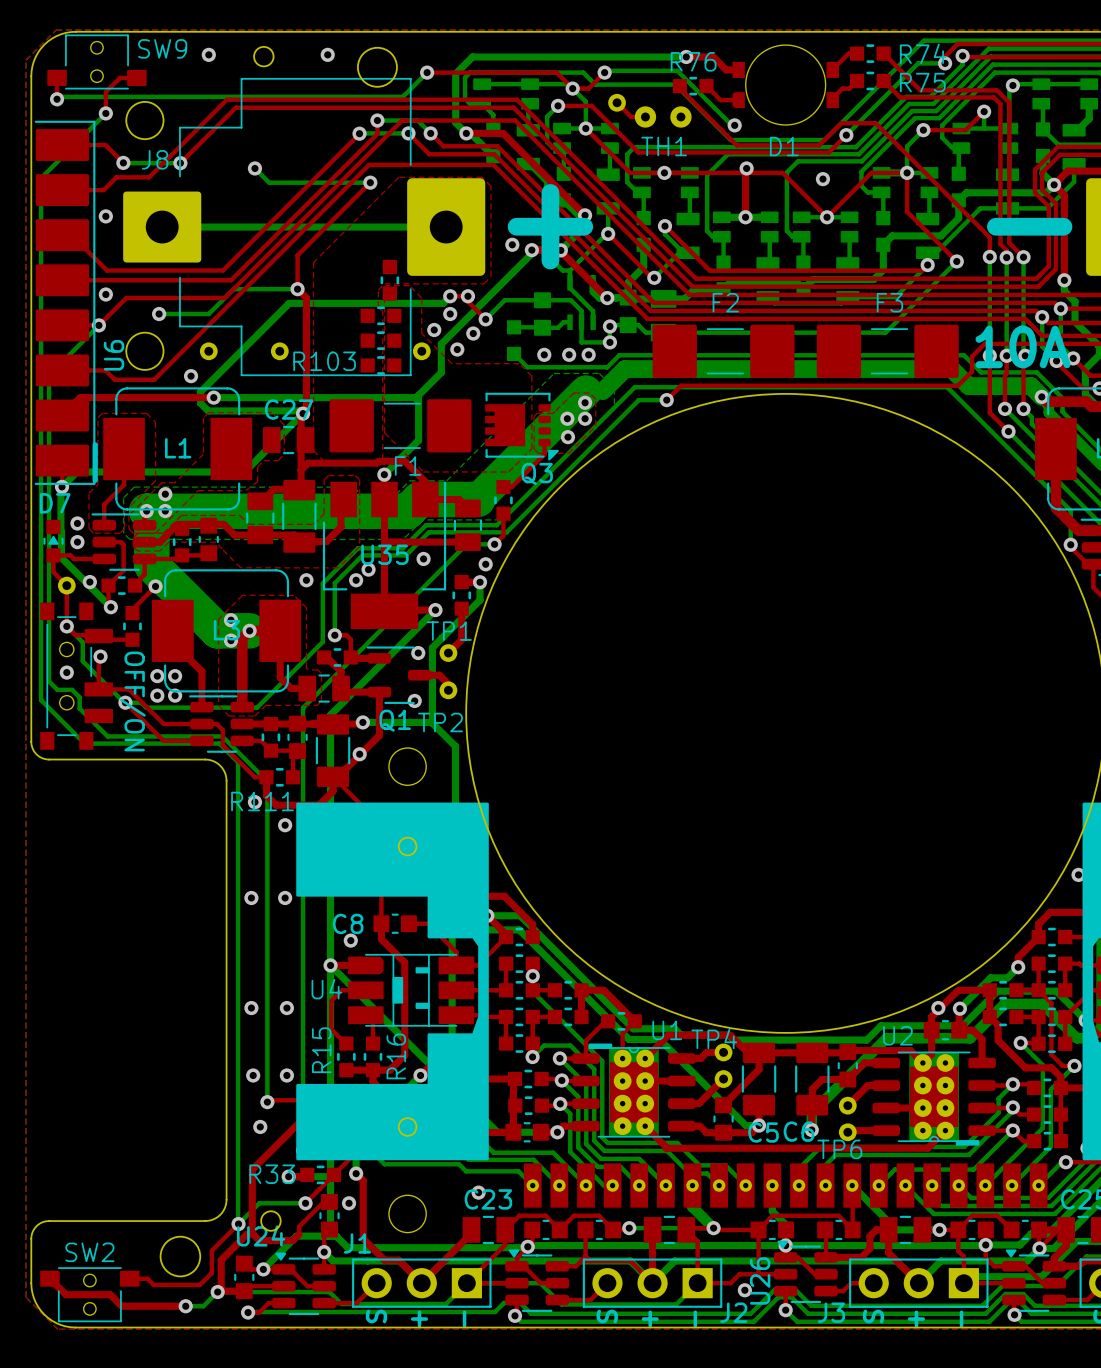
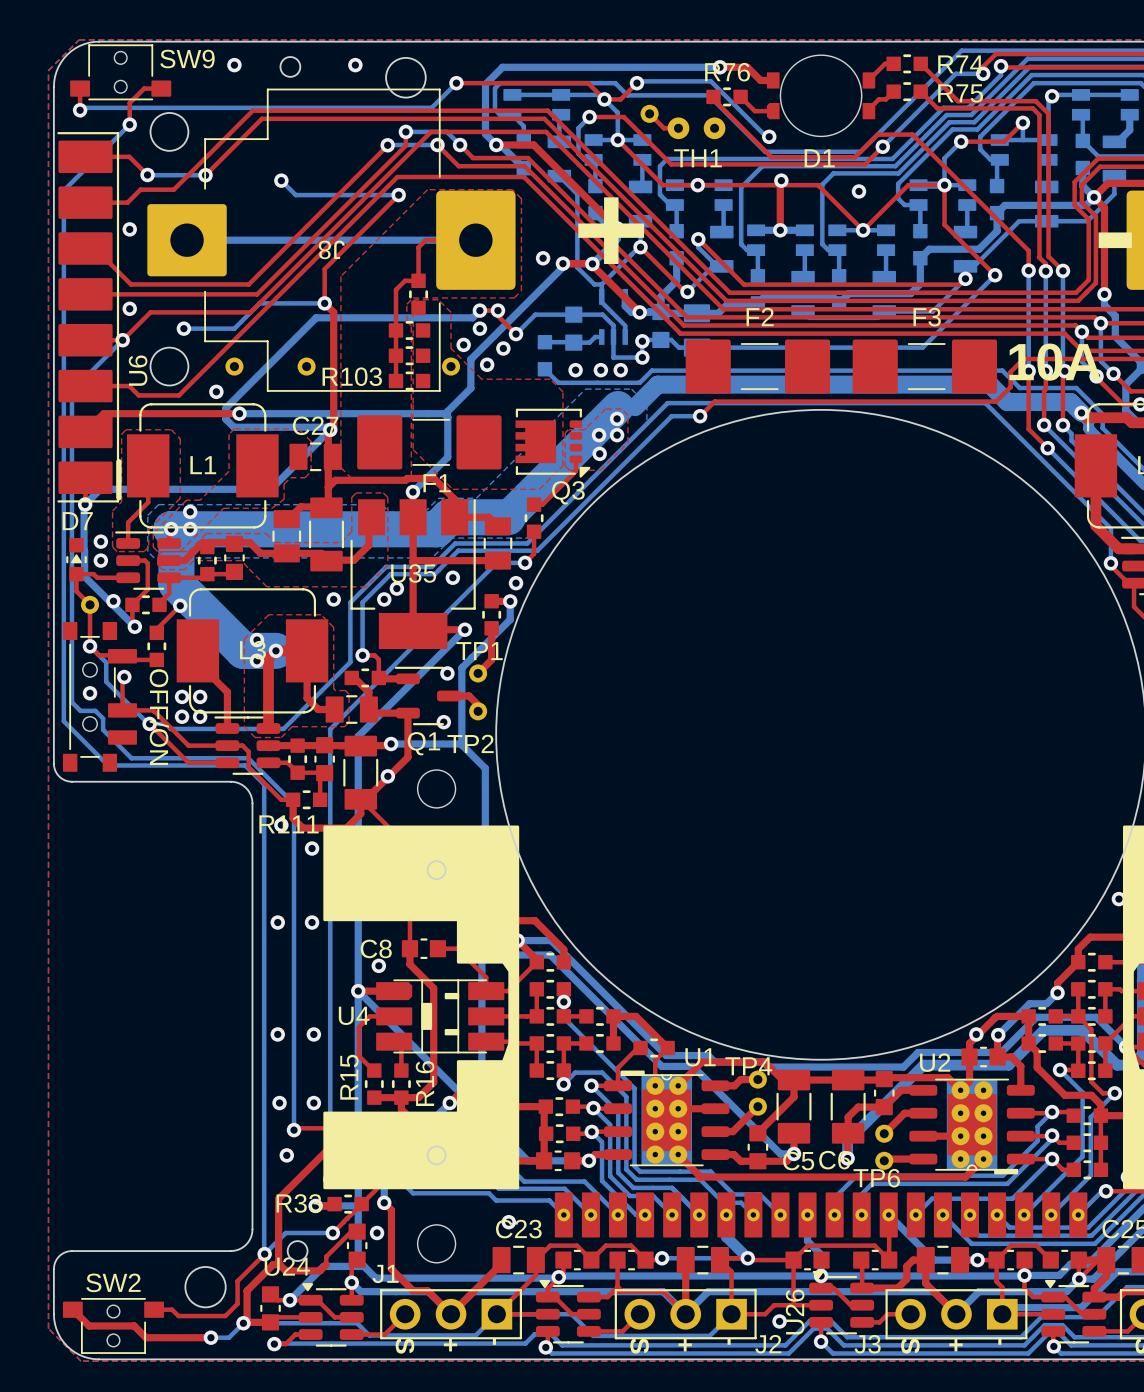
J8 name rotation: 0° (155, 159) -> 180° (331, 249)
J8 name position: J8 (155, 159) -> J8 (331, 249)
top track: none -> (472, 240) (425, 240) (418, 247) (418, 280) (405, 280) (395, 289) (395, 381)

